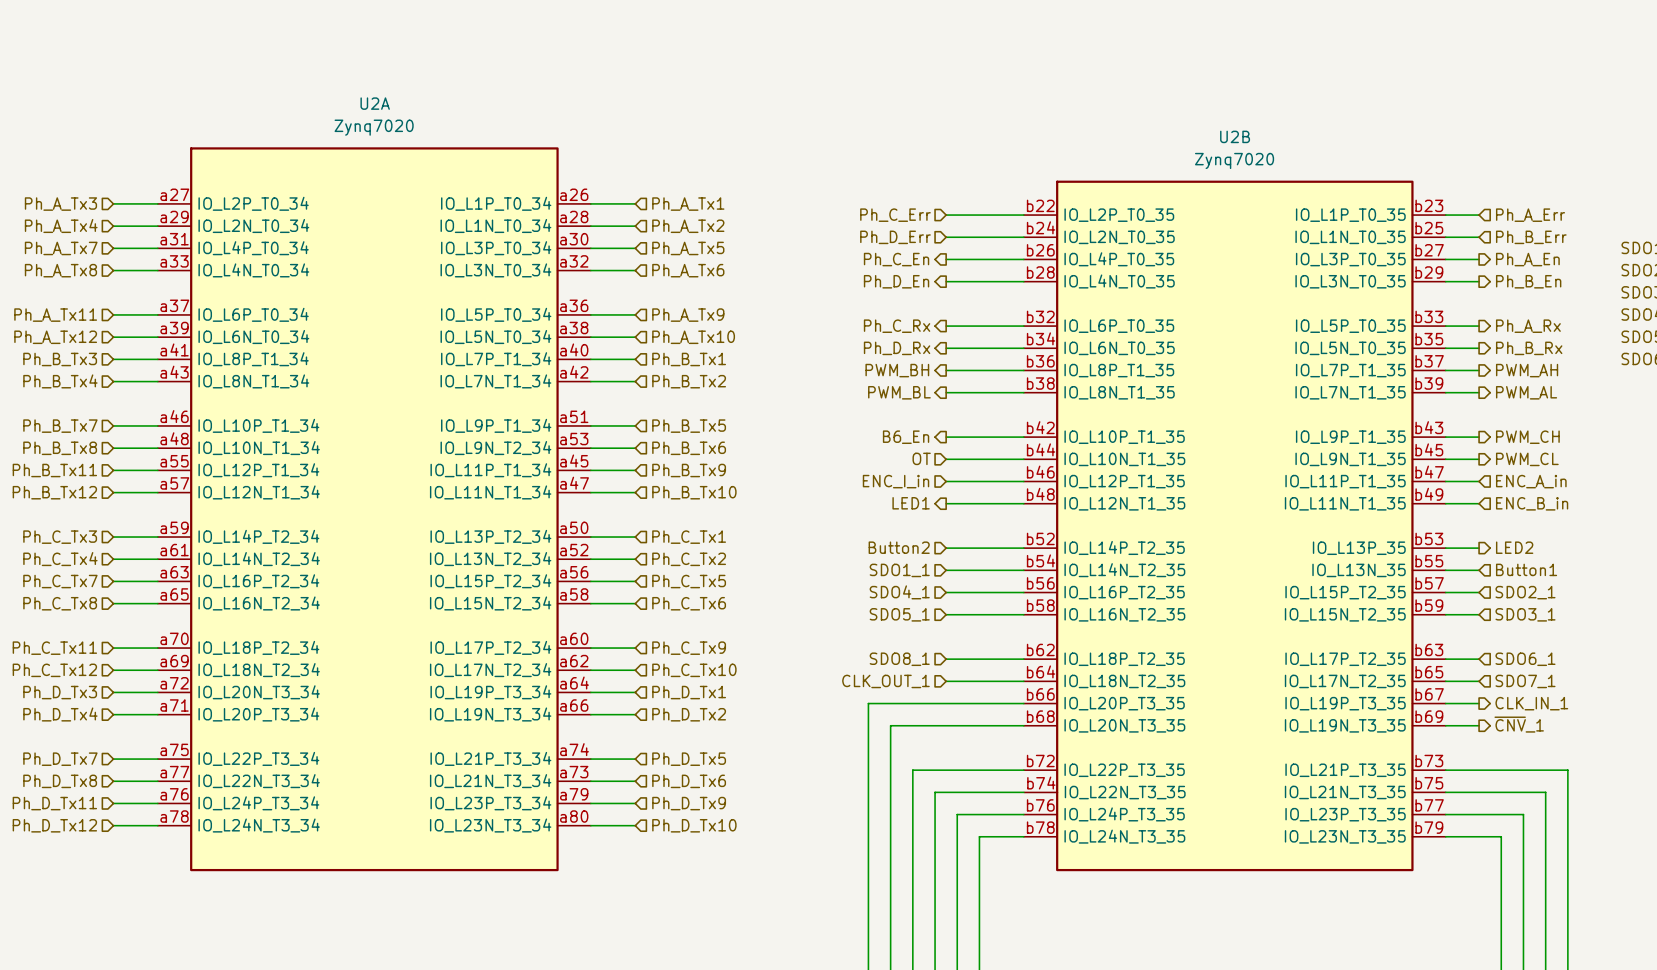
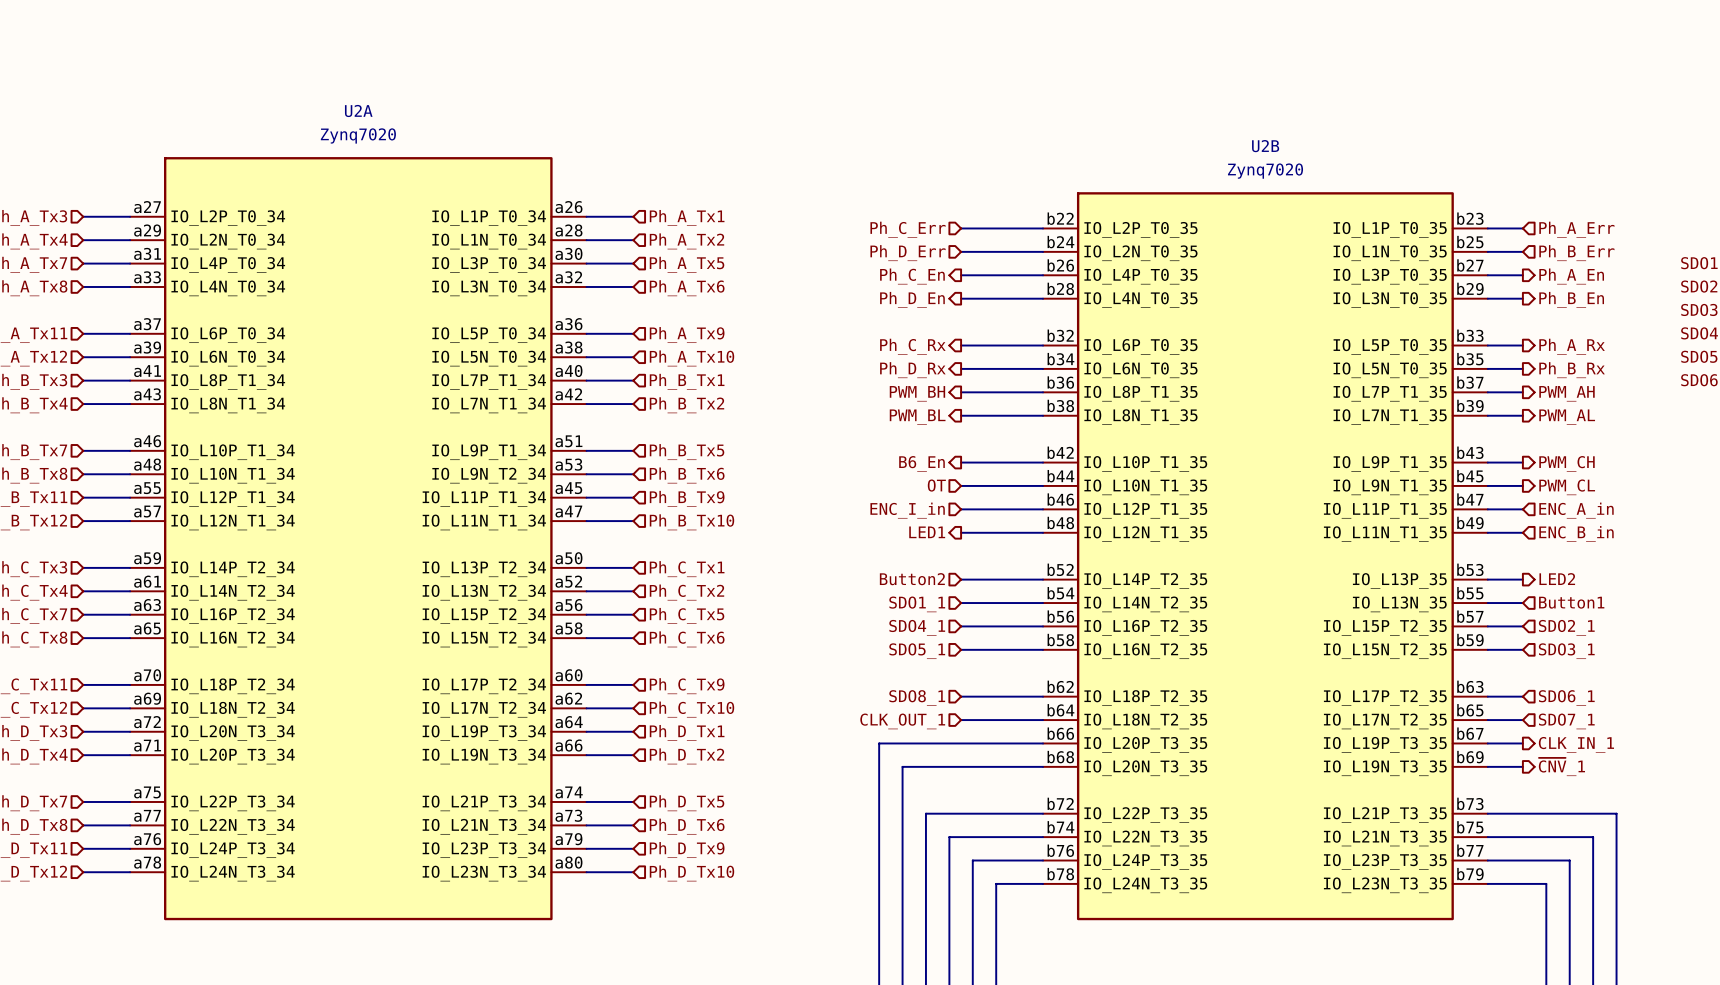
U2B symbol: [1023, 180, 1446, 872] -> [1043, 192, 1488, 921]

